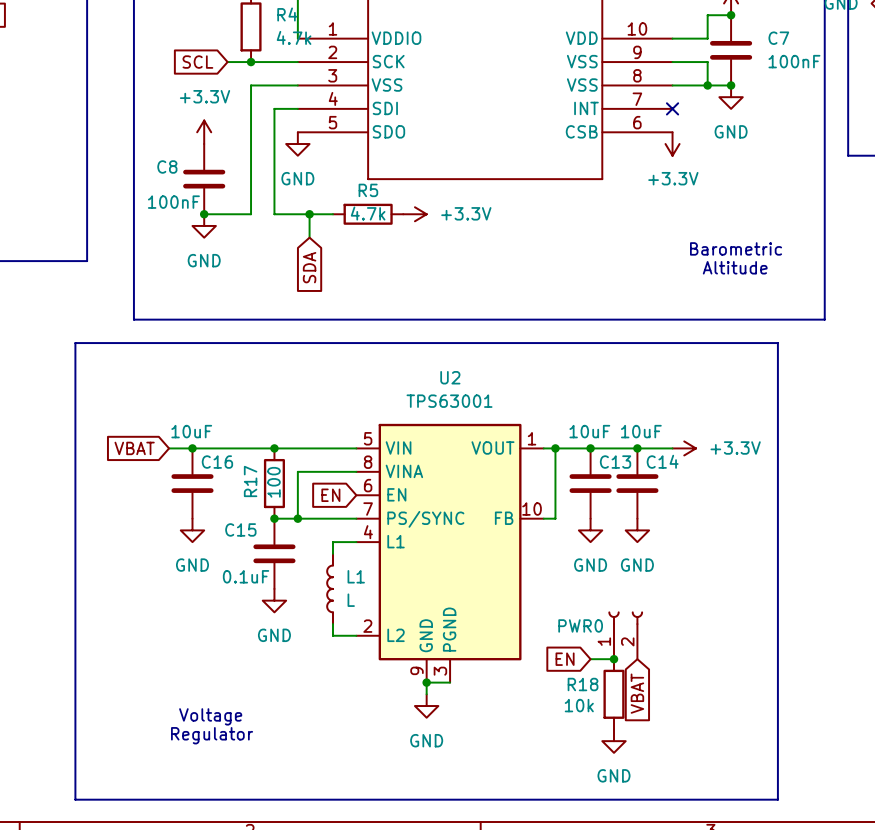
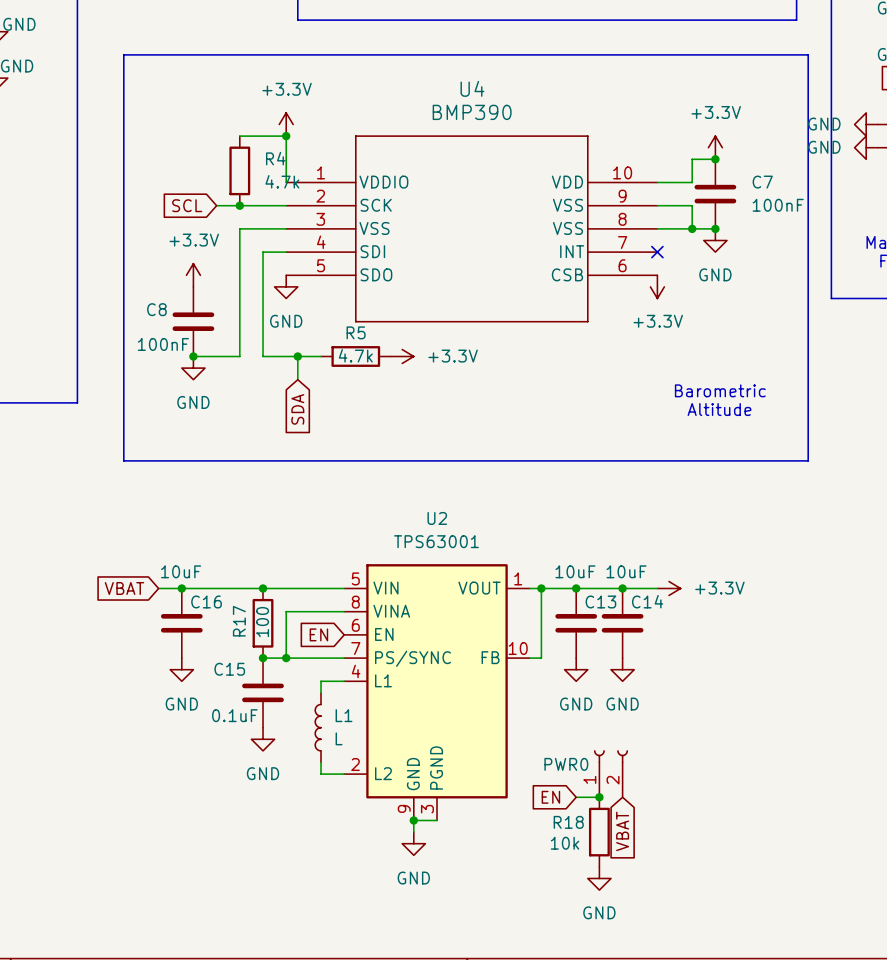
line: (75, 343) (777, 343) (777, 799) (75, 799) (75, 343) -> none
text: Voltage (210, 716) -> none
text: Regulator (212, 735) -> none

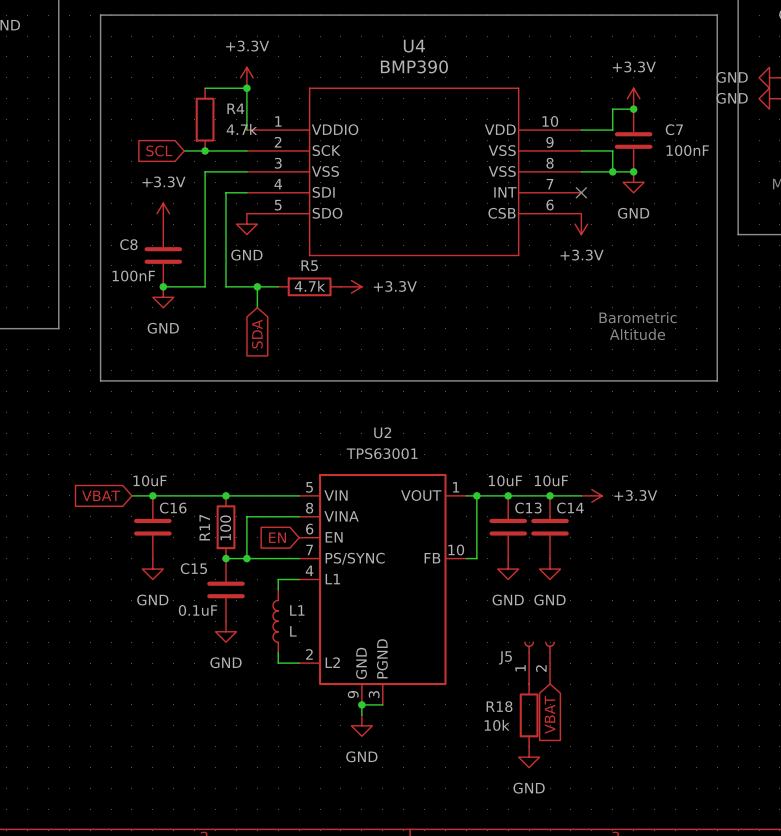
PWR0 name: PWR0 (566, 764) -> J5 (505, 657)
global label: EN (550, 797) -> none
wire: (576, 797) (599, 797) -> none
junction: (599, 797) -> none

